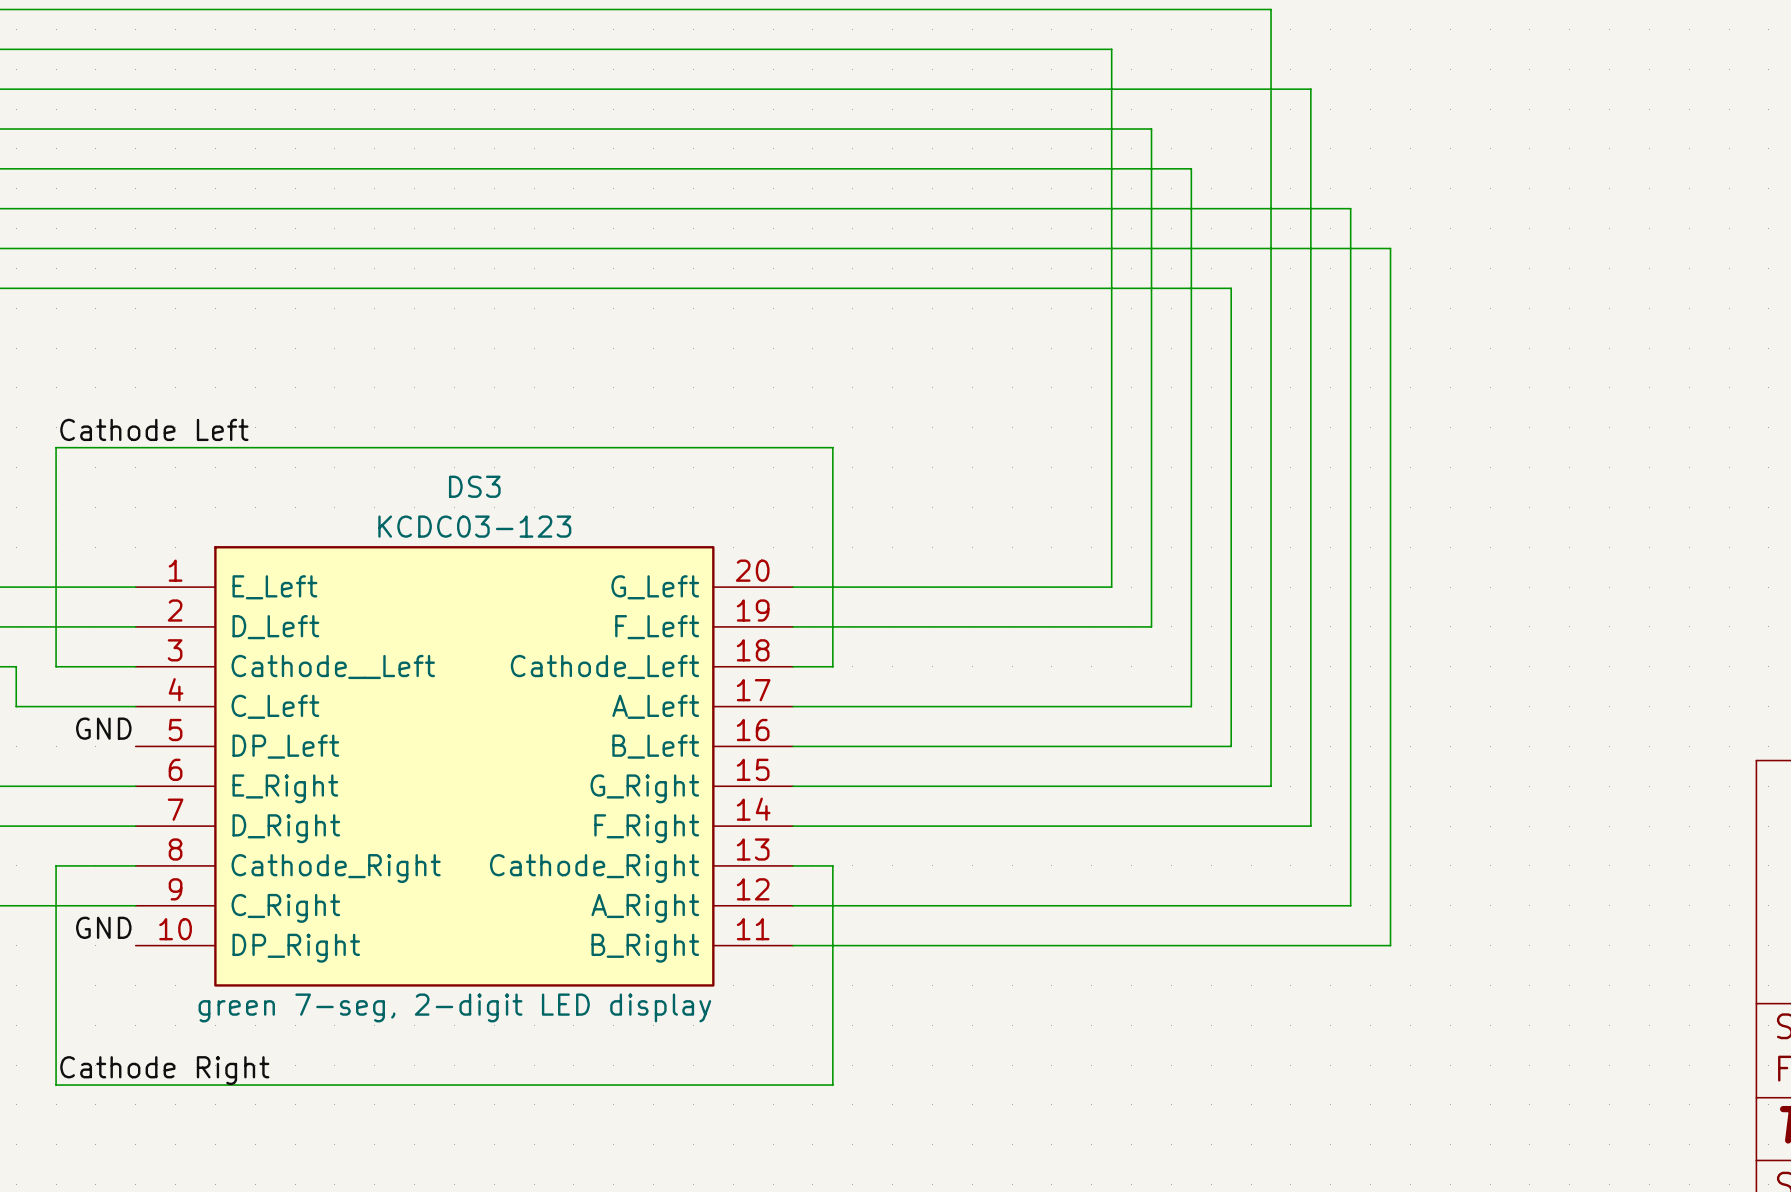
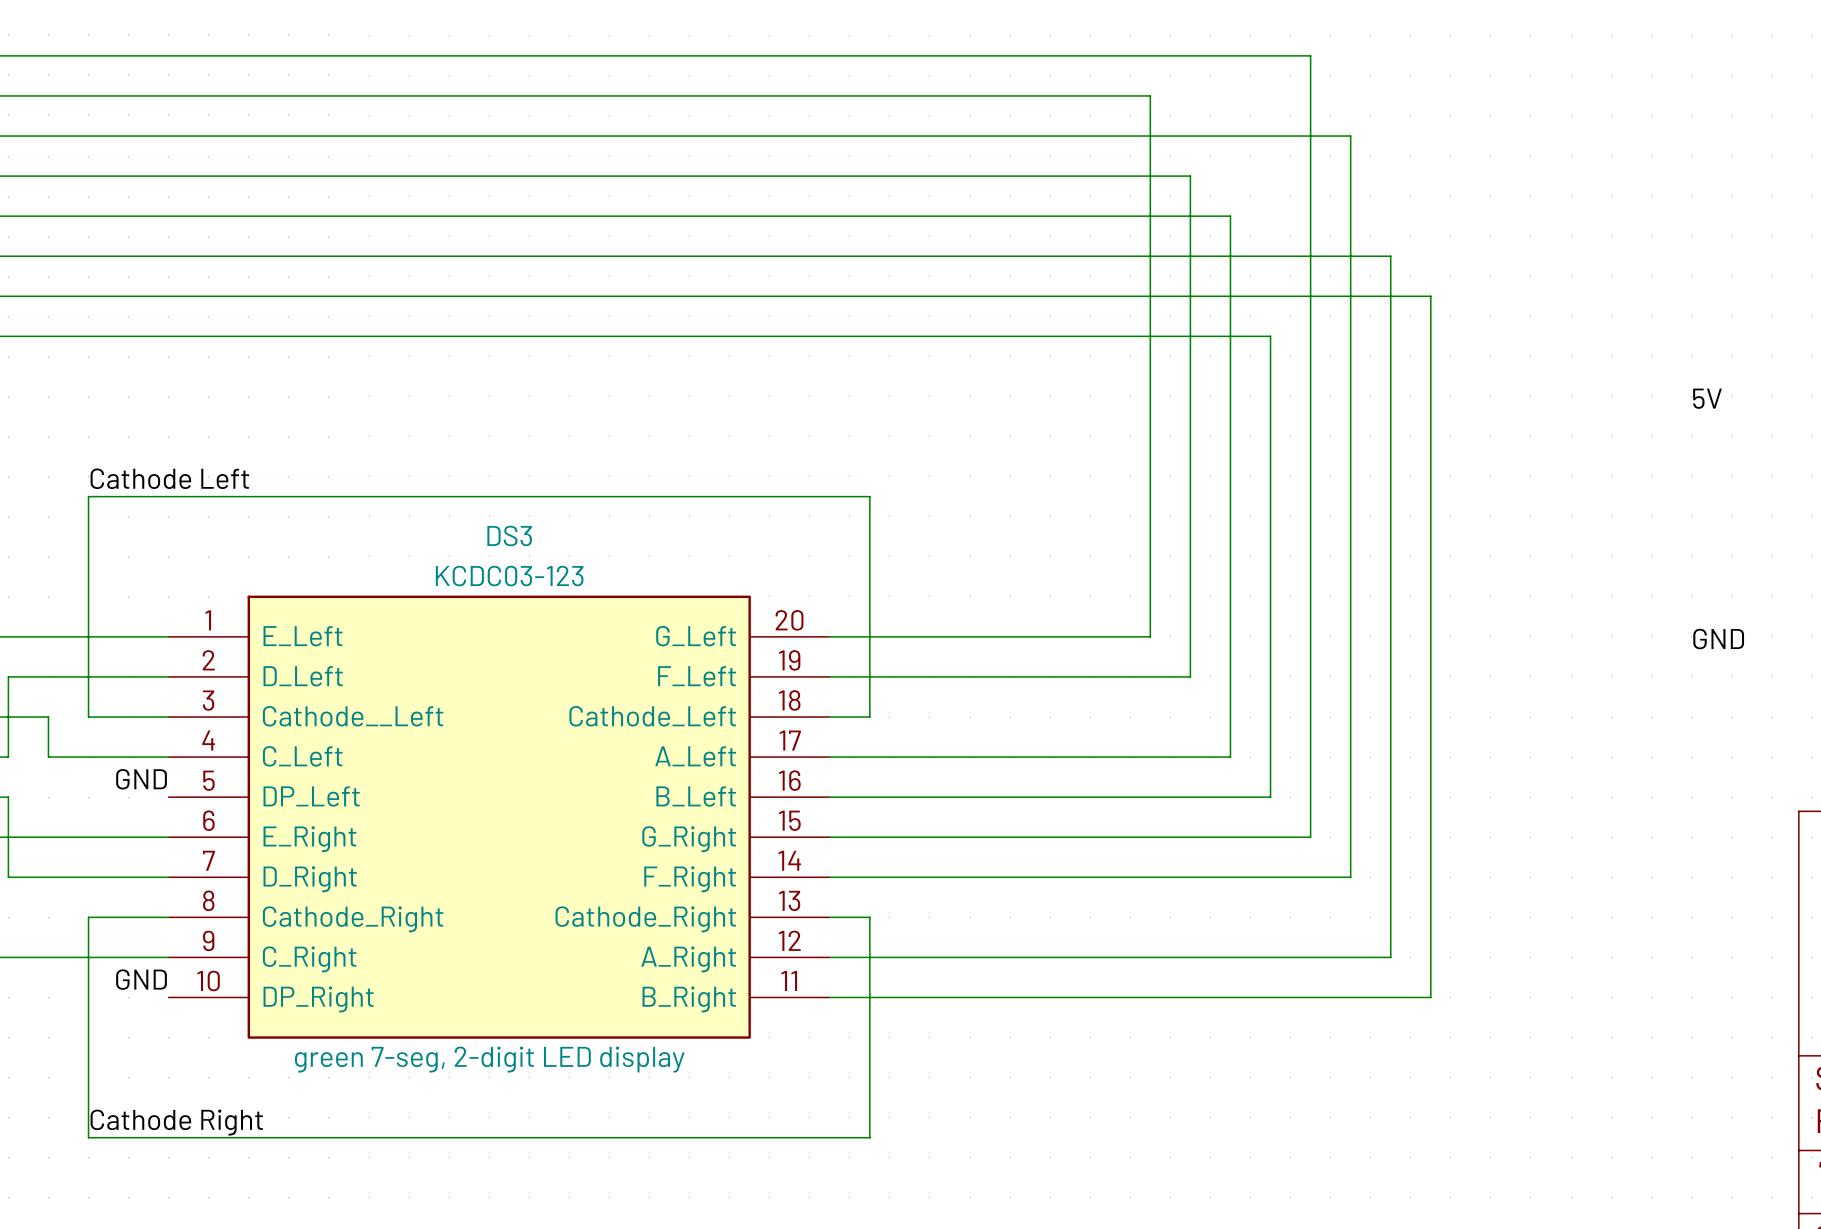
label: none -> 5V (1707, 398)
label: none -> GND (1718, 639)

